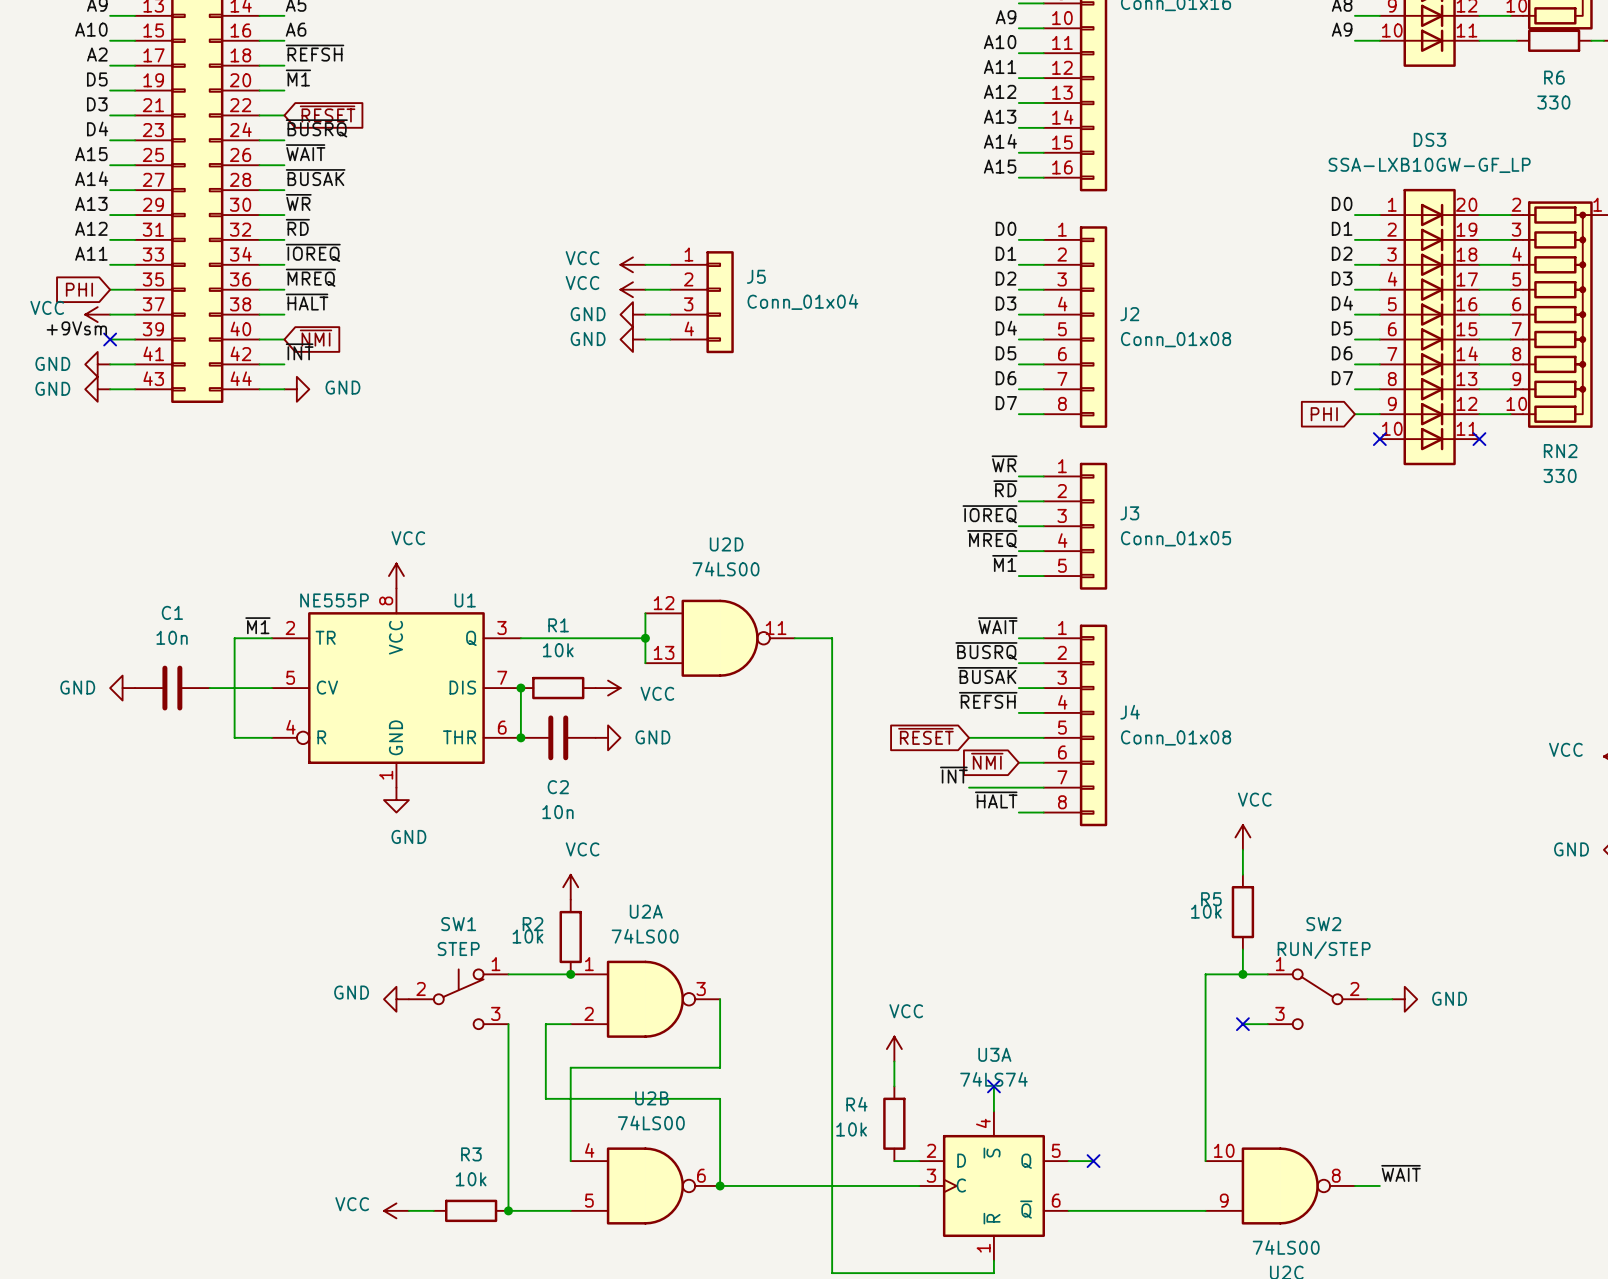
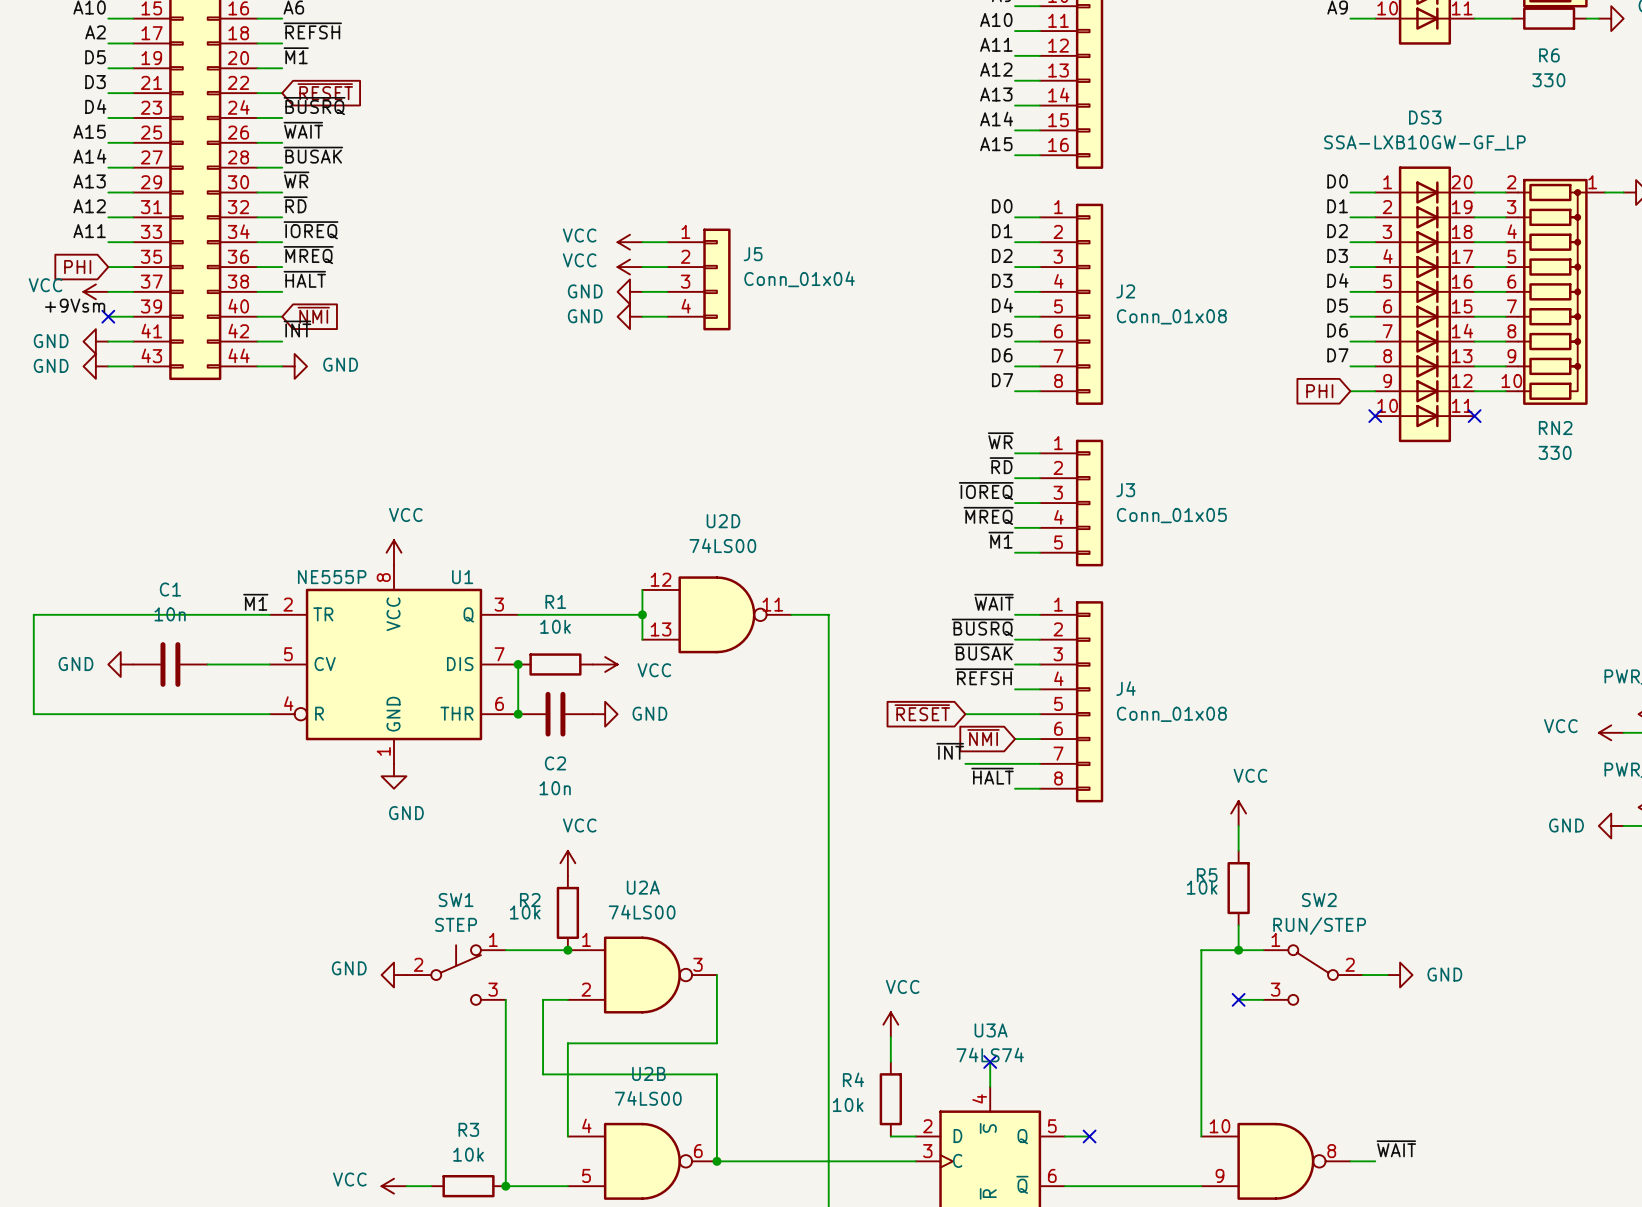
wire: (234, 638) (234, 737) -> (232, 614) (33, 614) (33, 714) (232, 714)

